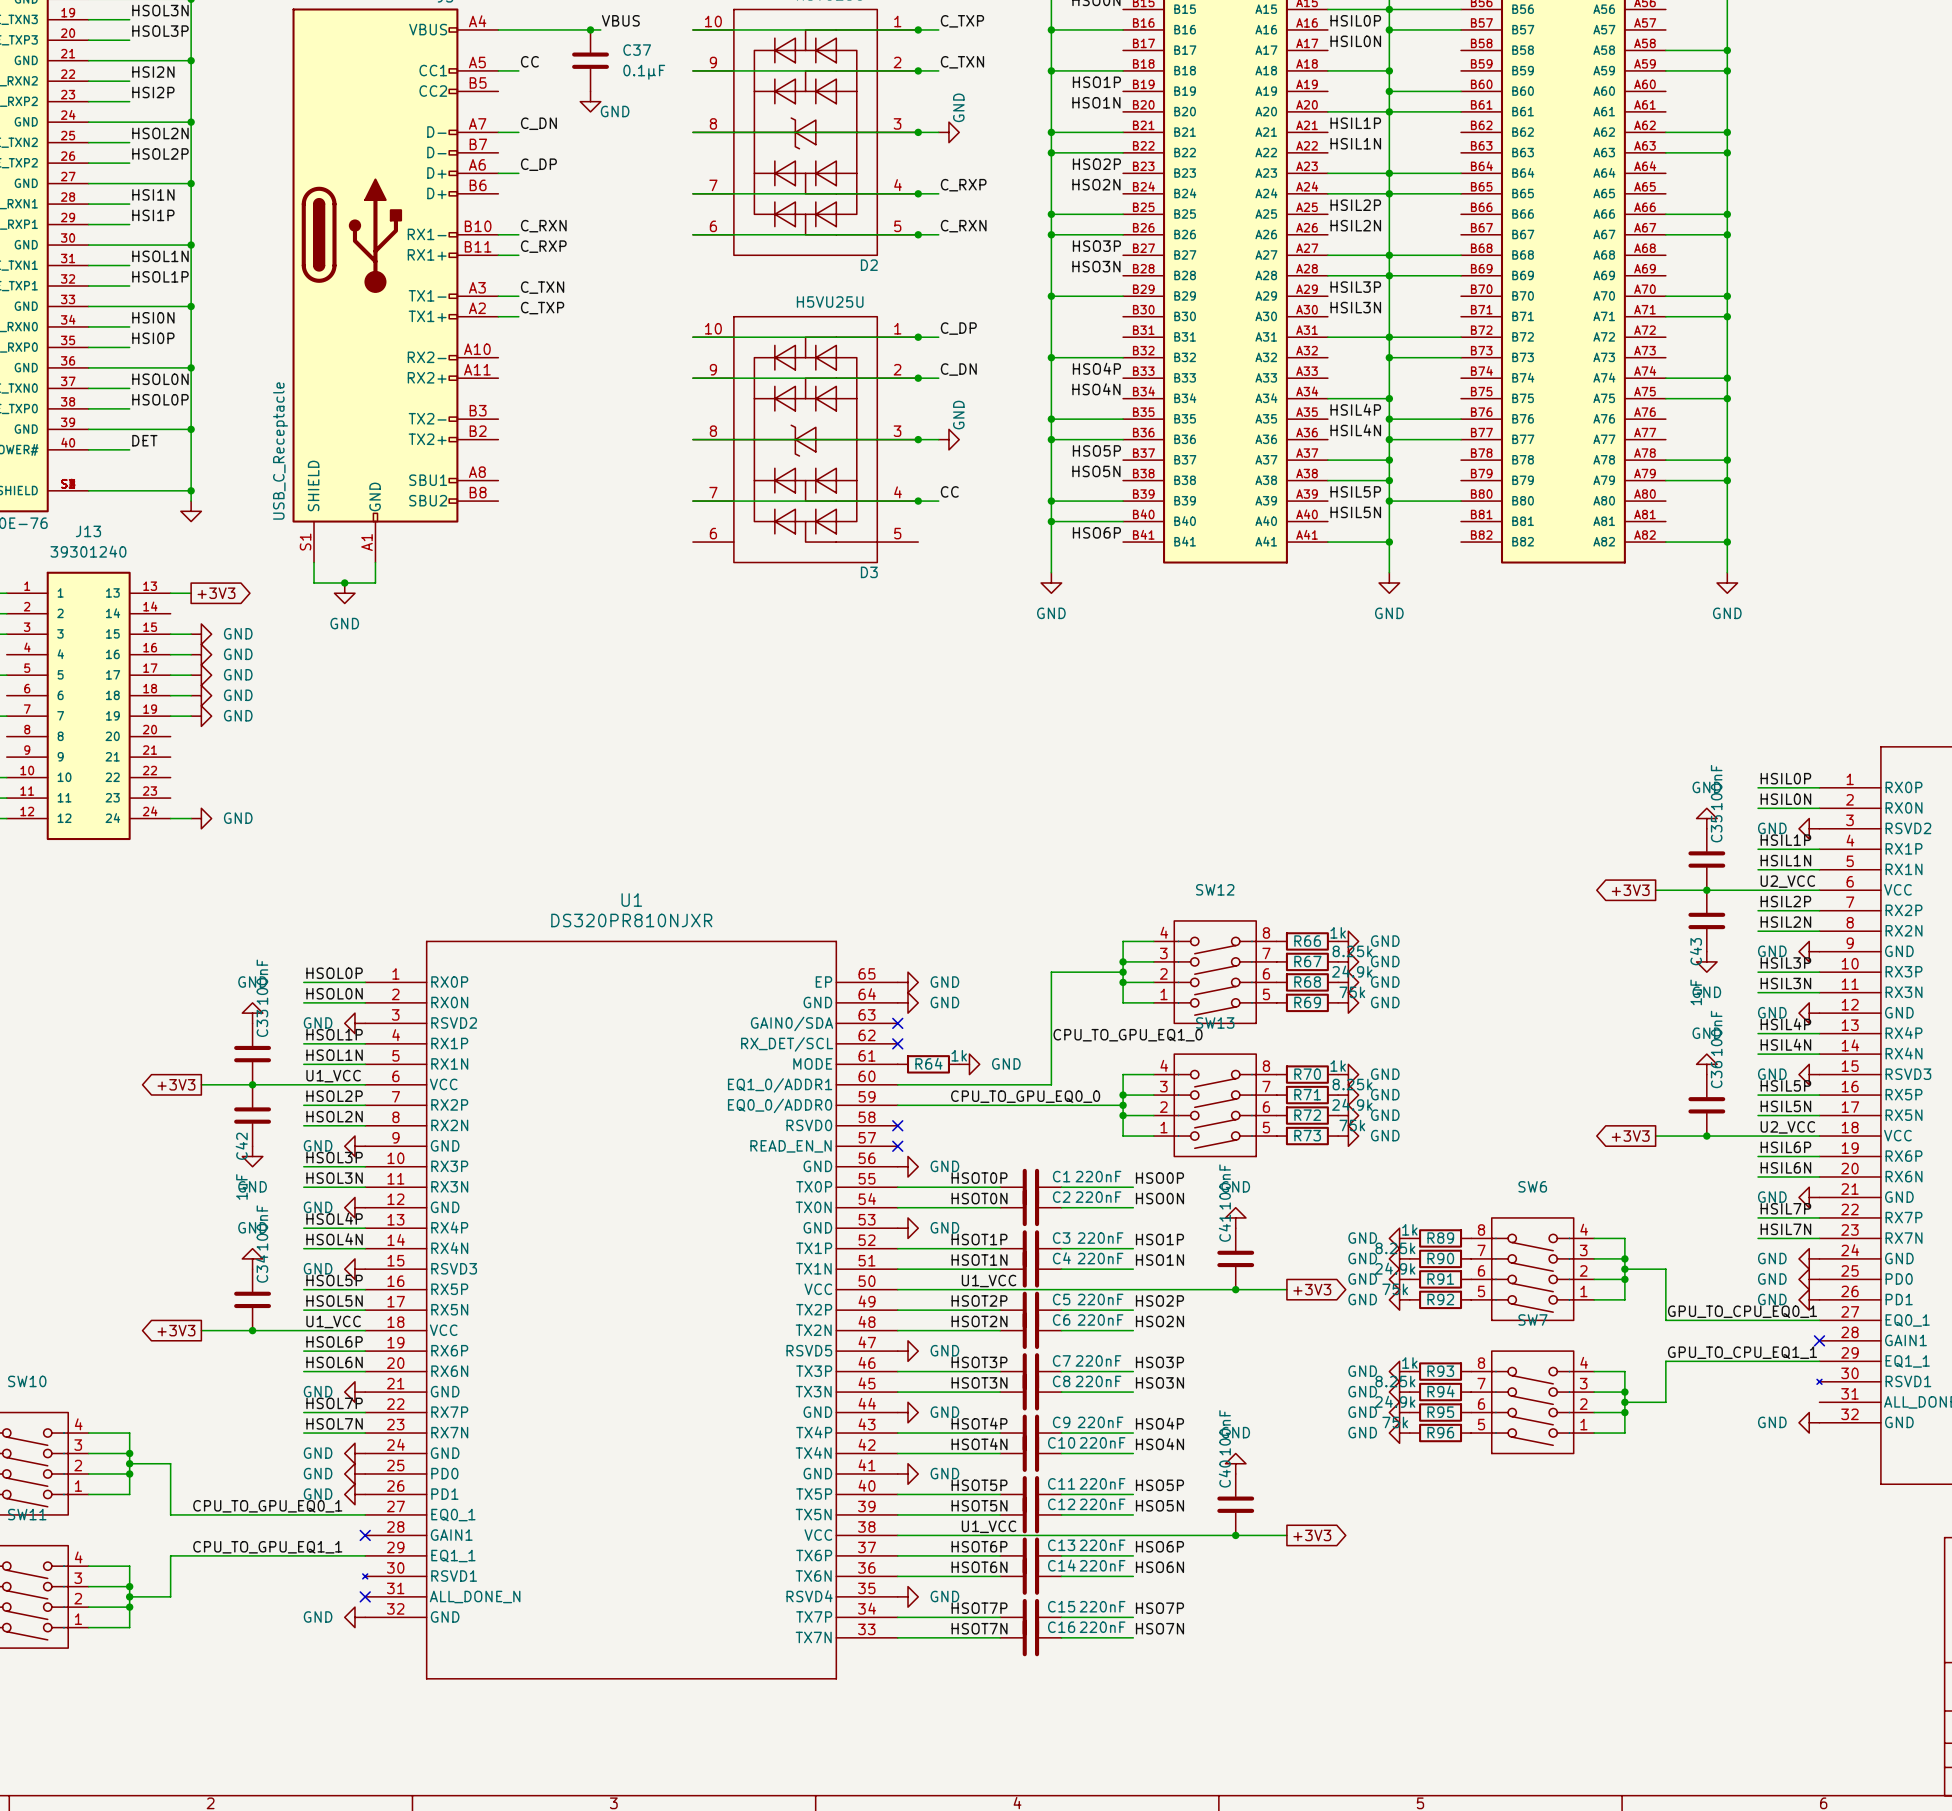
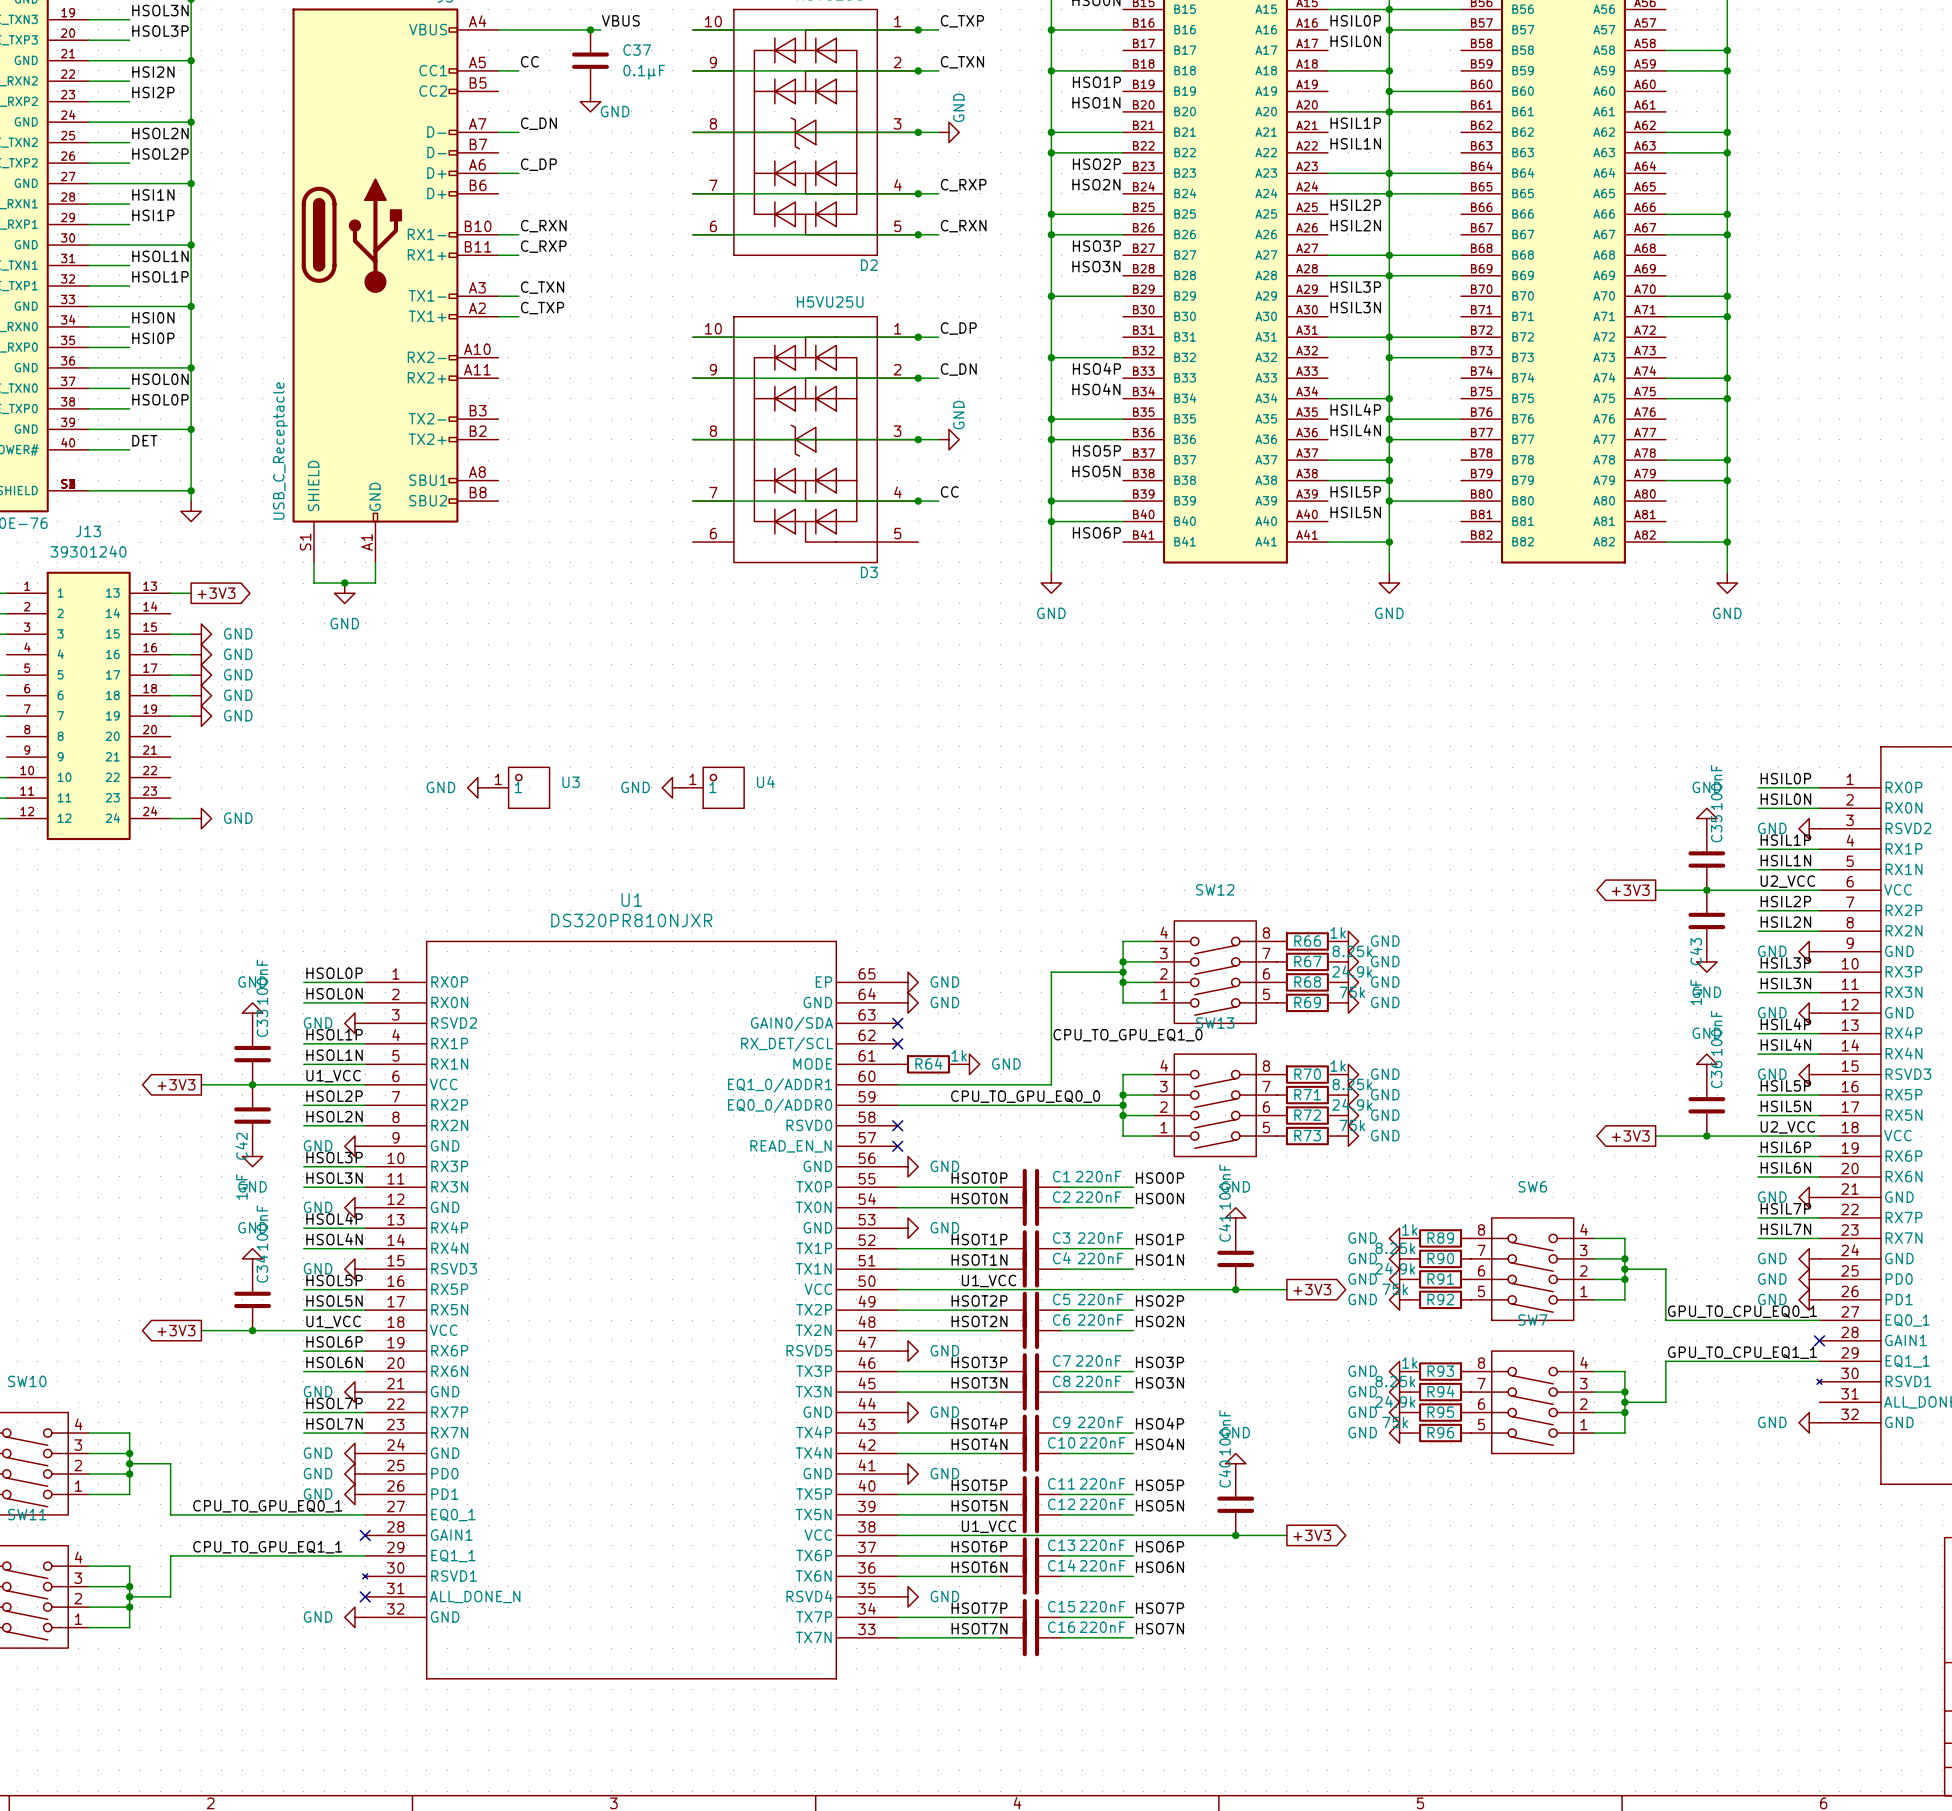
power symbol: none -> GND (477, 787)
U3: none -> (518, 787)
power symbol: none -> GND (672, 787)
U4: none -> (713, 787)

